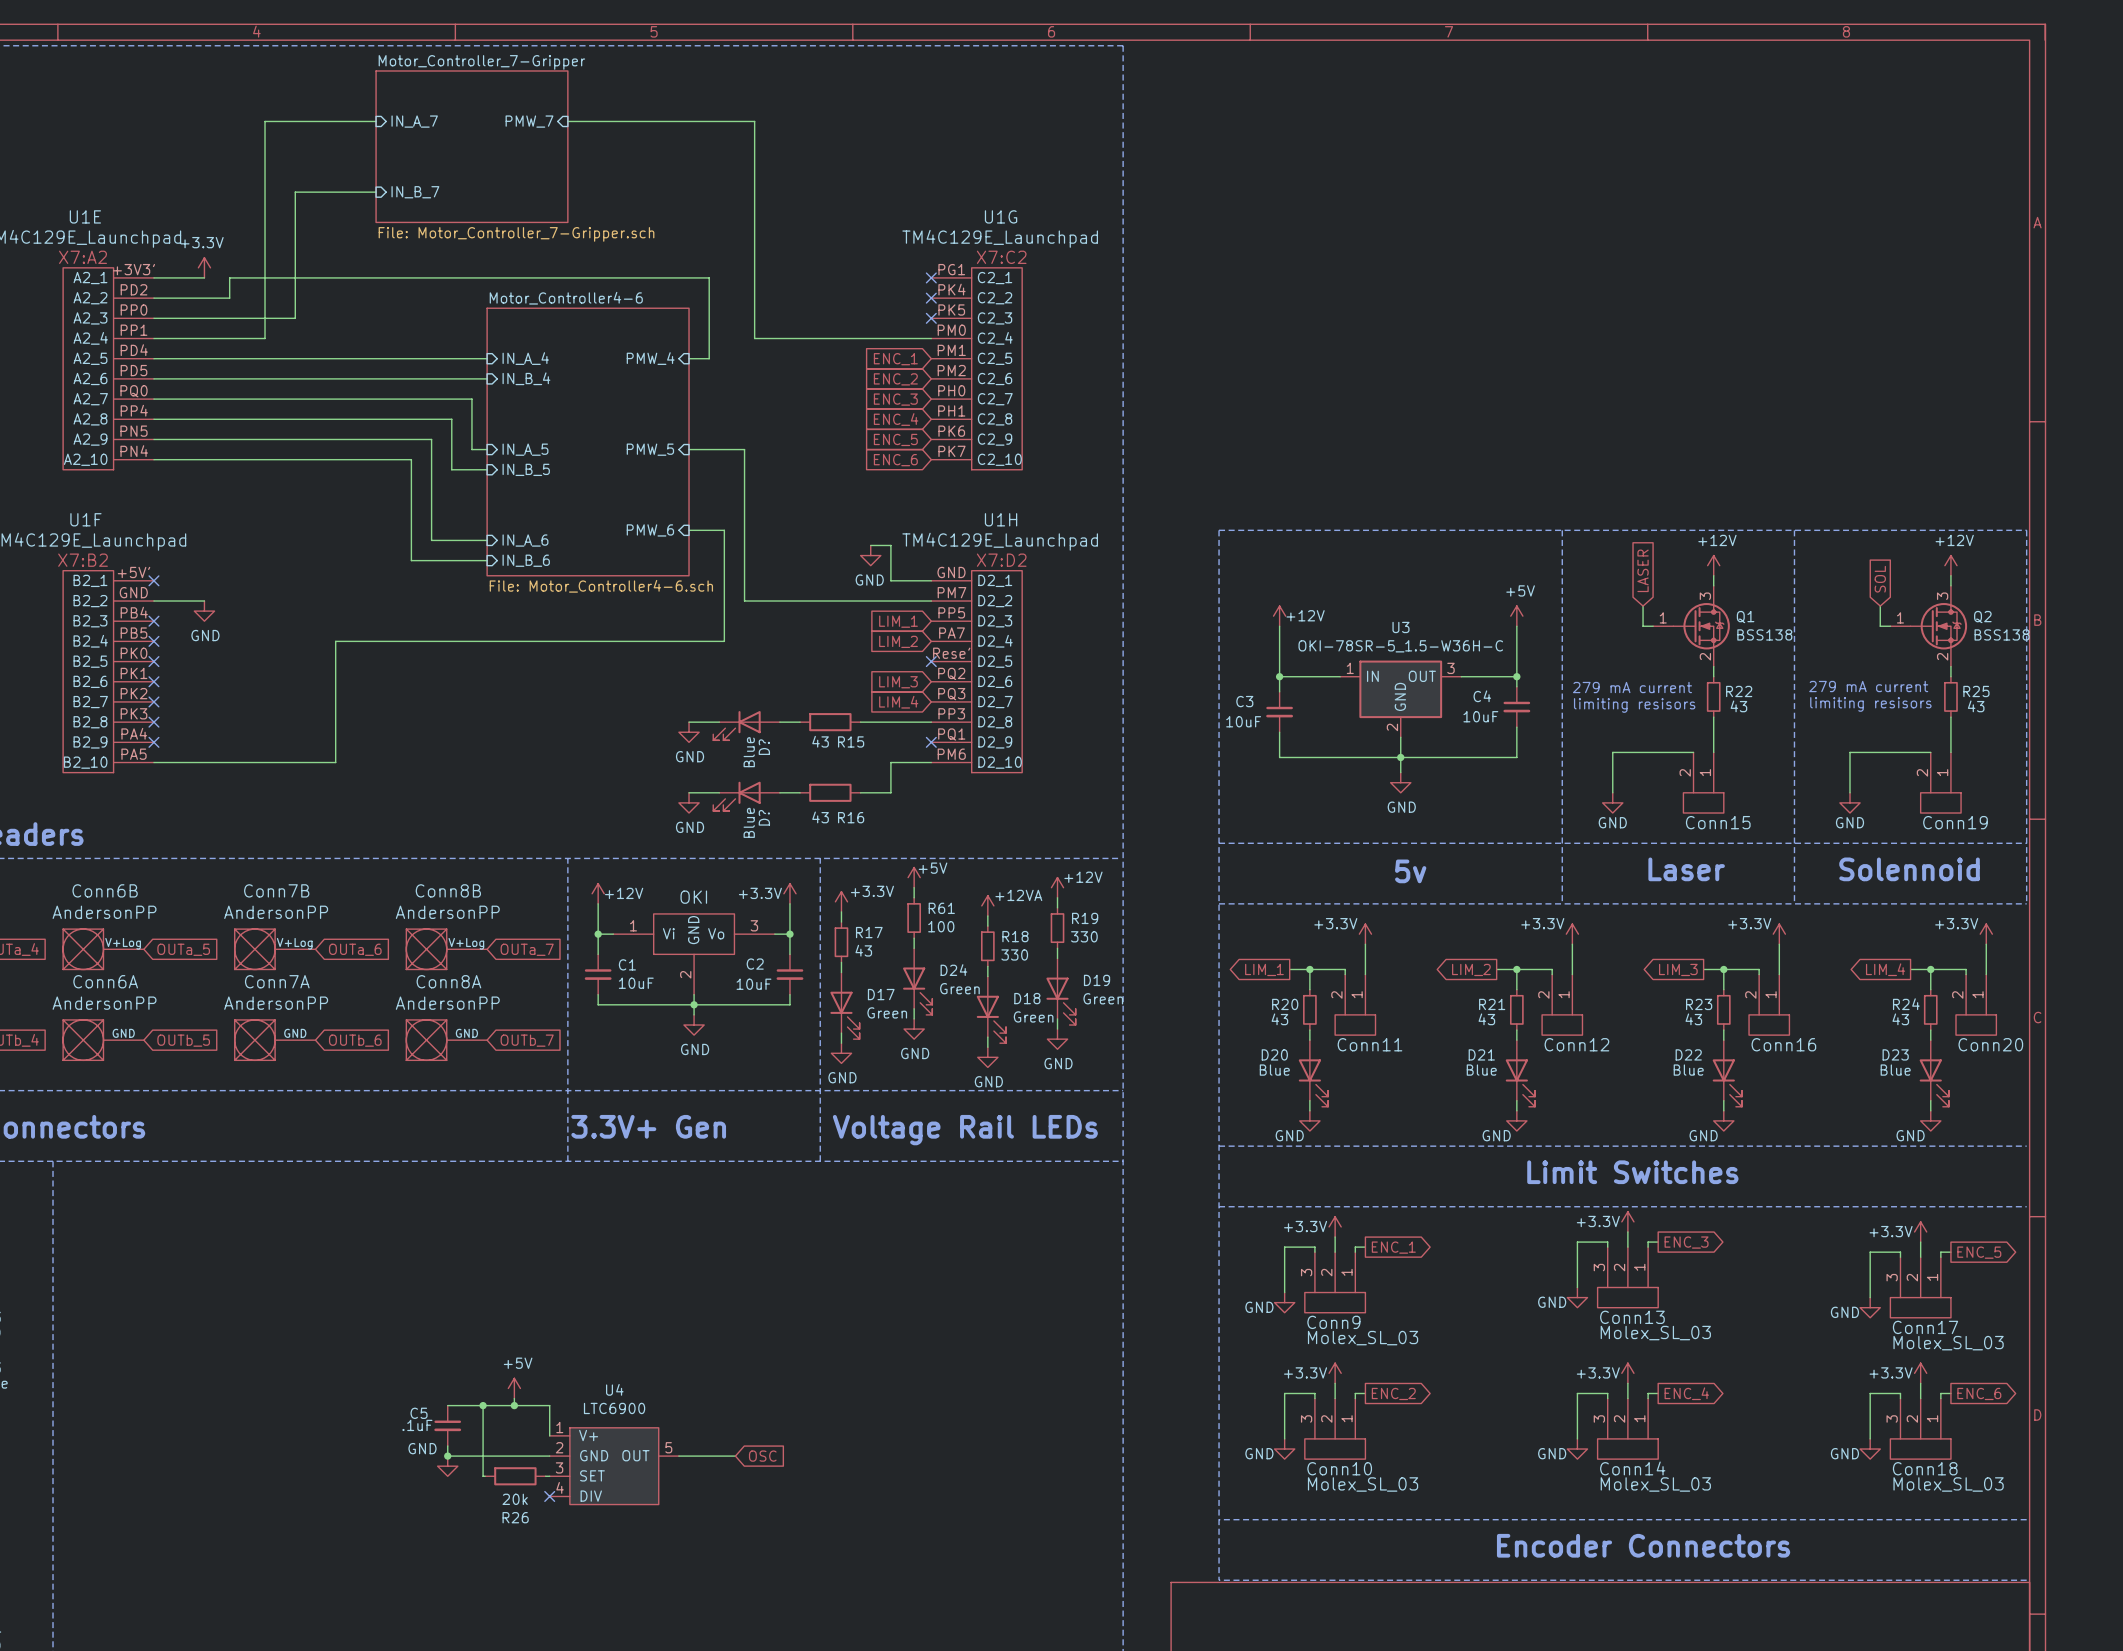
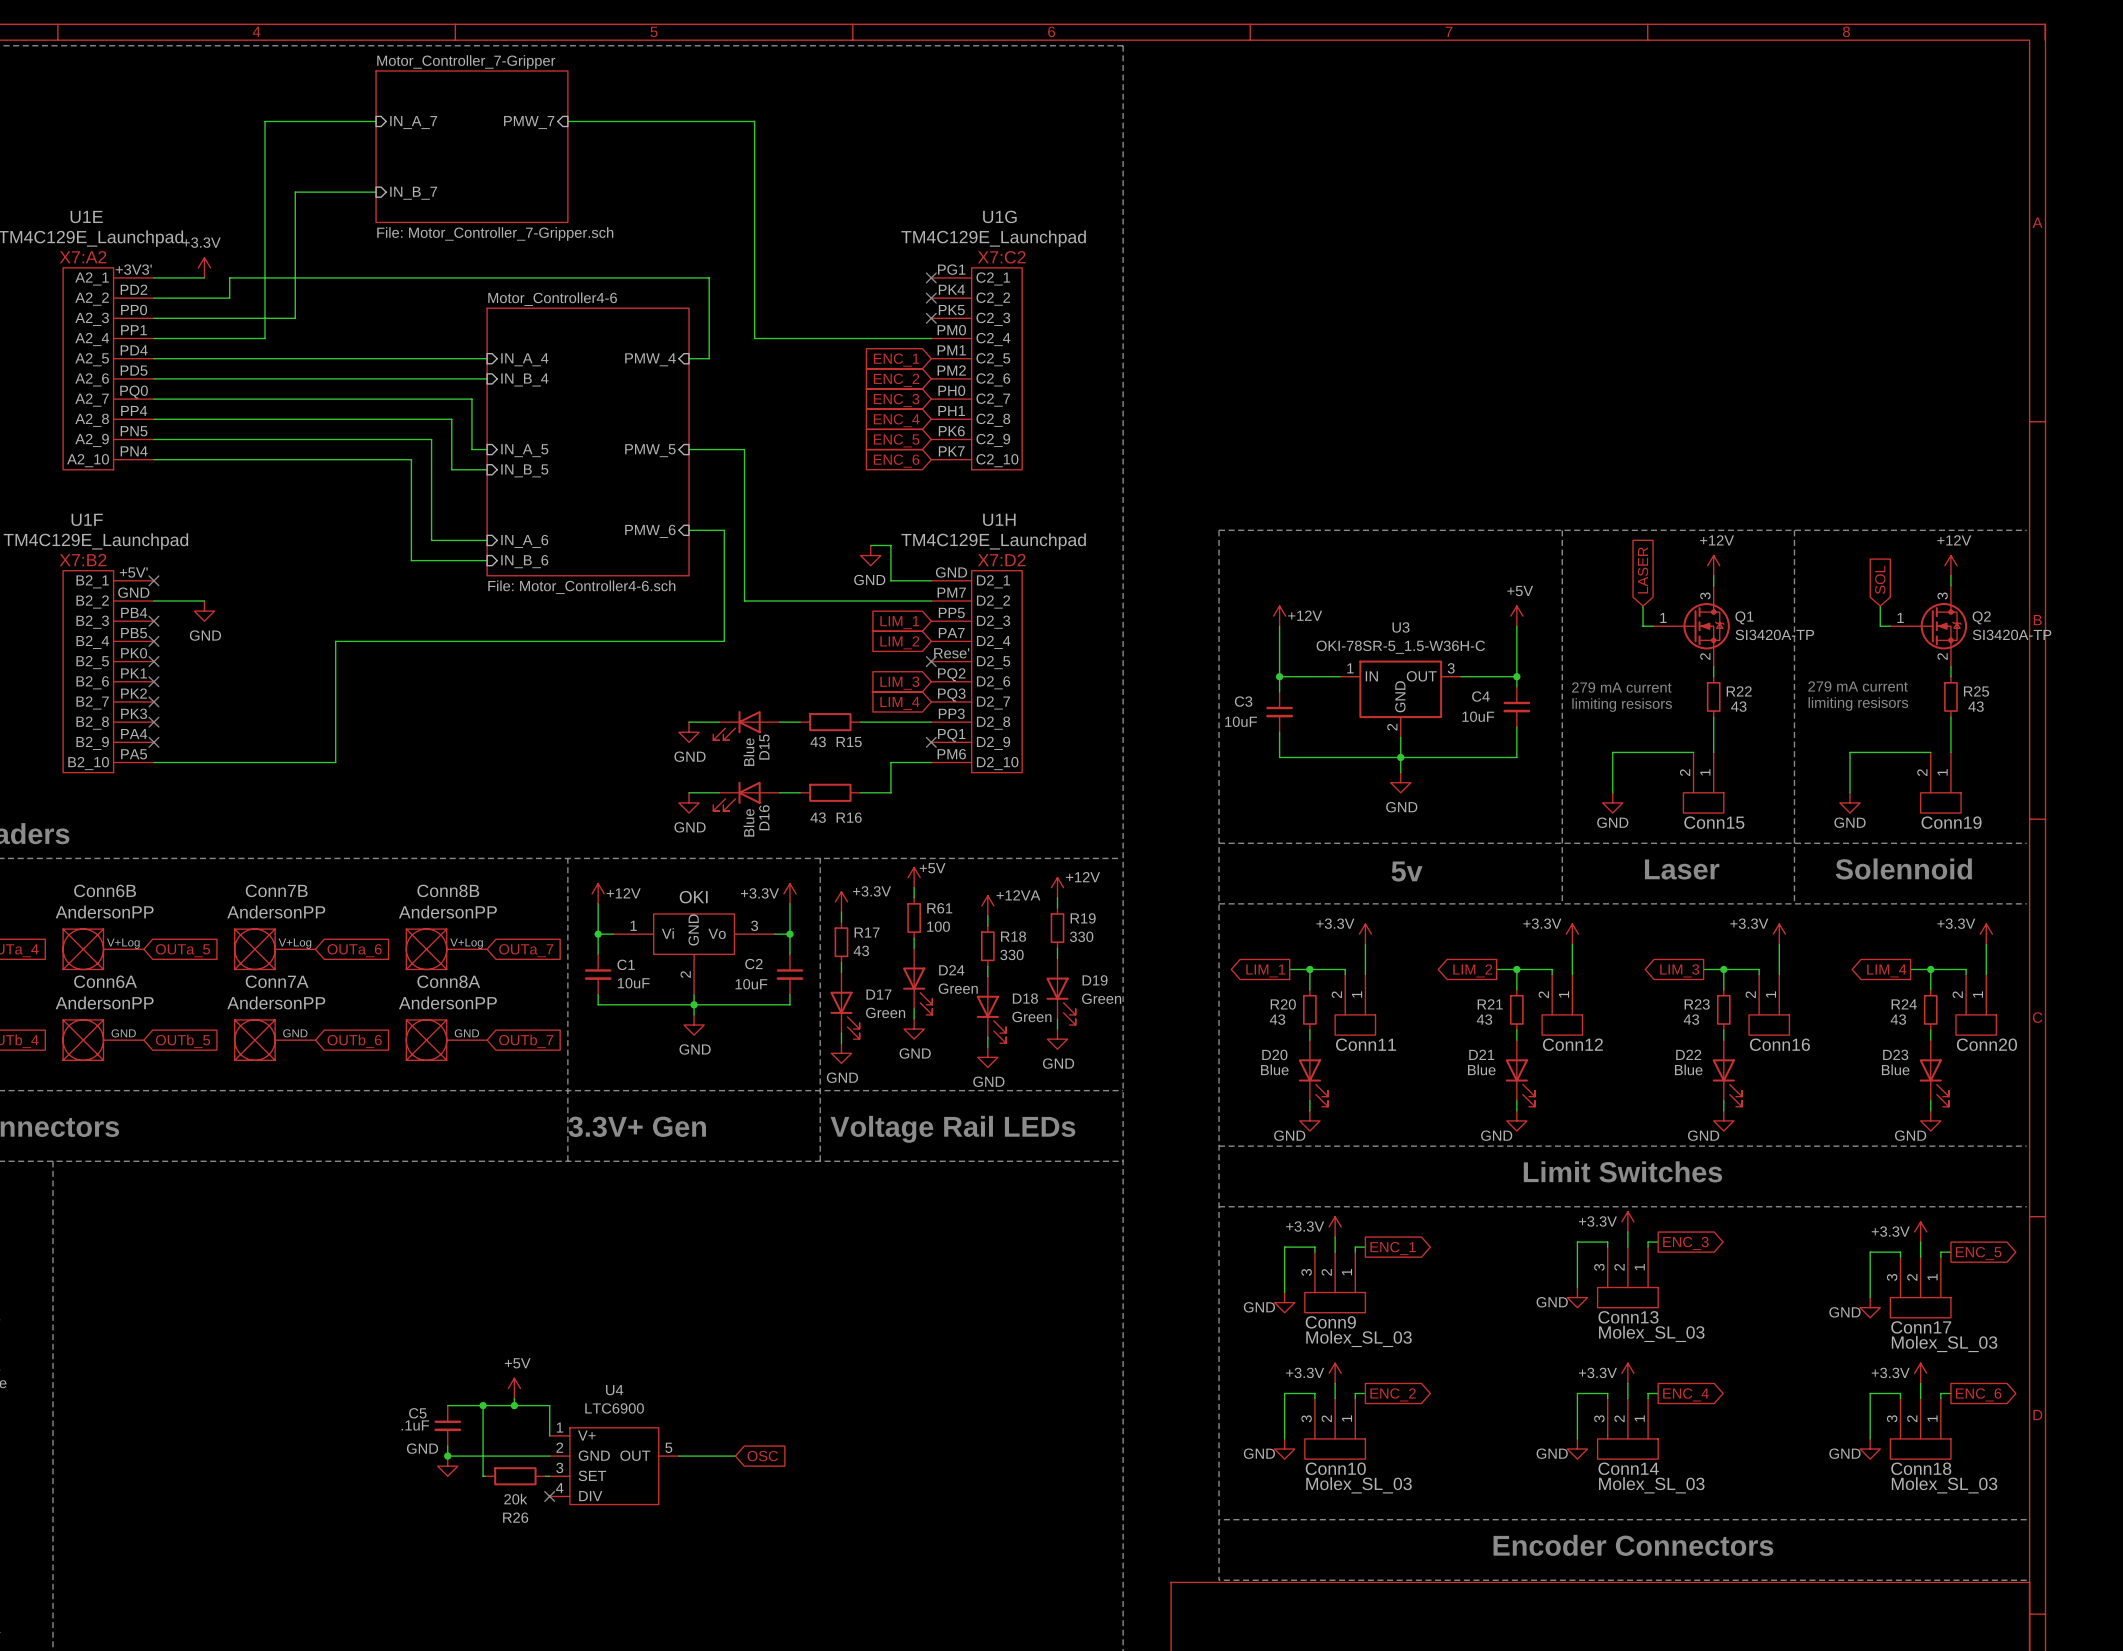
line: (2026, 530) (2026, 903) -> none
Q1 value: BSS138 (1764, 634) -> SI3420A-TP (1774, 634)
Q2 value: BSS138 (2002, 634) -> SI3420A-TP (2012, 634)
D? name: D? (764, 747) -> D15 (764, 747)
D? name: D? (764, 817) -> D16 (764, 817)

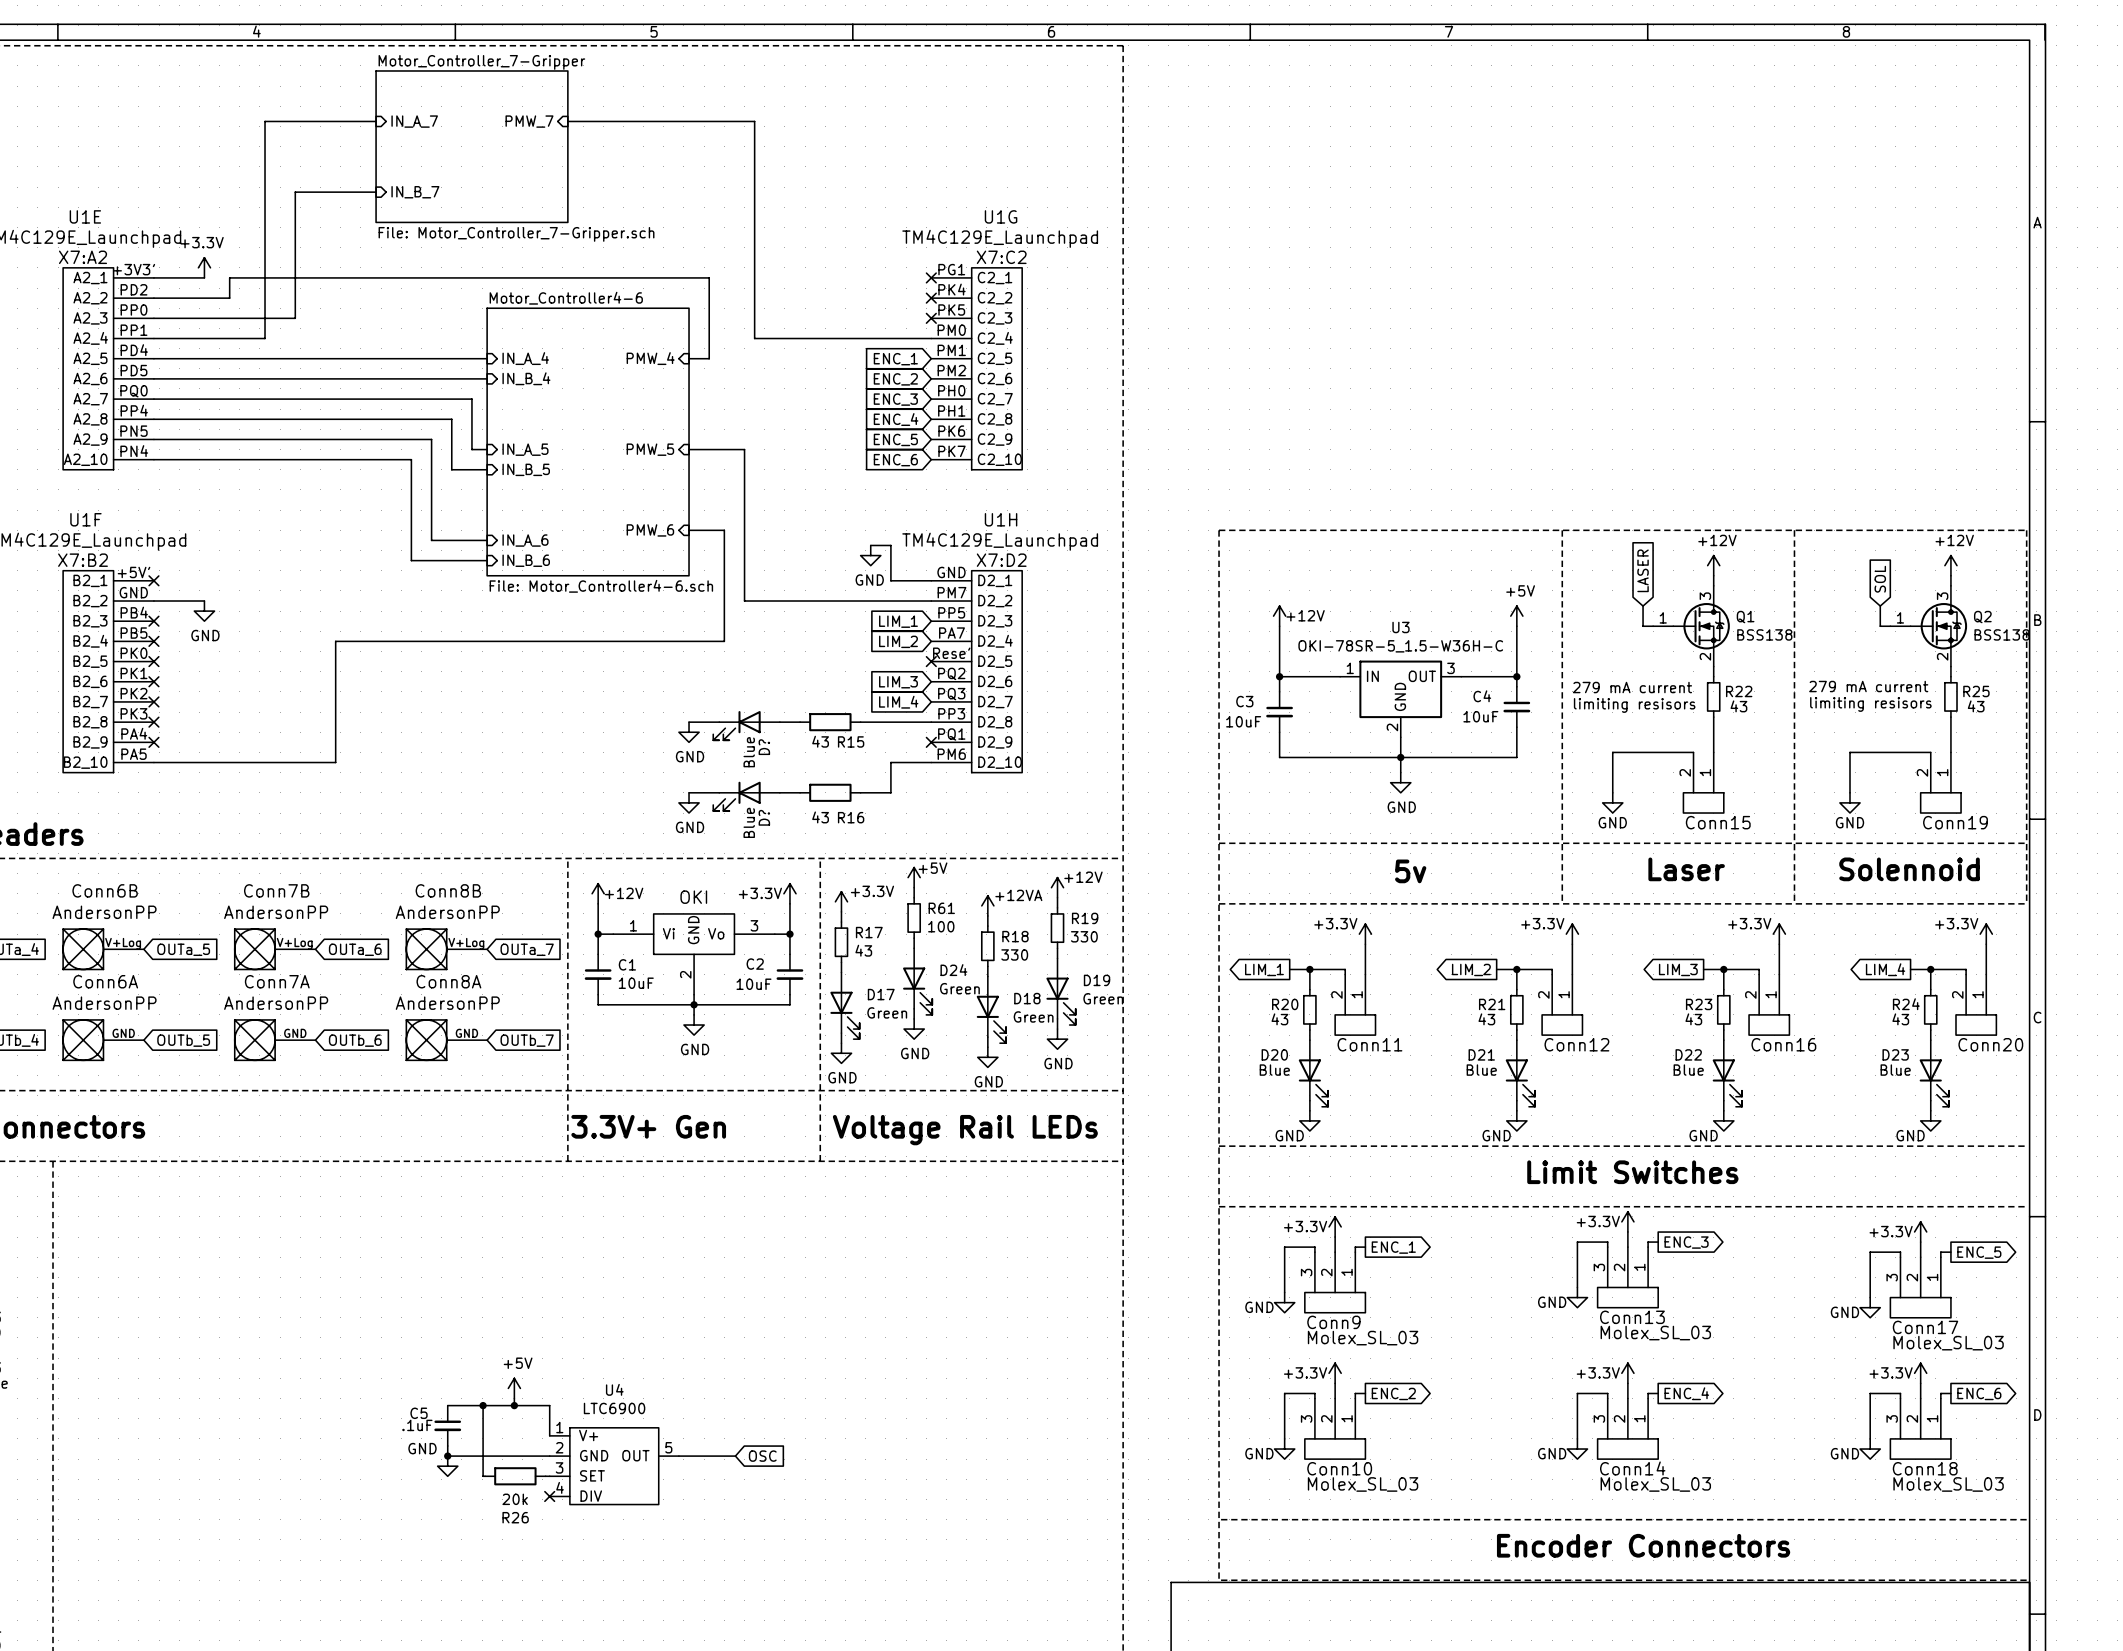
line: none -> (2026, 530) (2026, 903)
Q1 value: SI3420A-TP (1774, 634) -> BSS138 (1764, 634)
Q2 value: SI3420A-TP (2012, 634) -> BSS138 (2002, 634)
D15 name: D15 (764, 747) -> D? (764, 747)
D16 name: D16 (764, 817) -> D? (764, 817)

